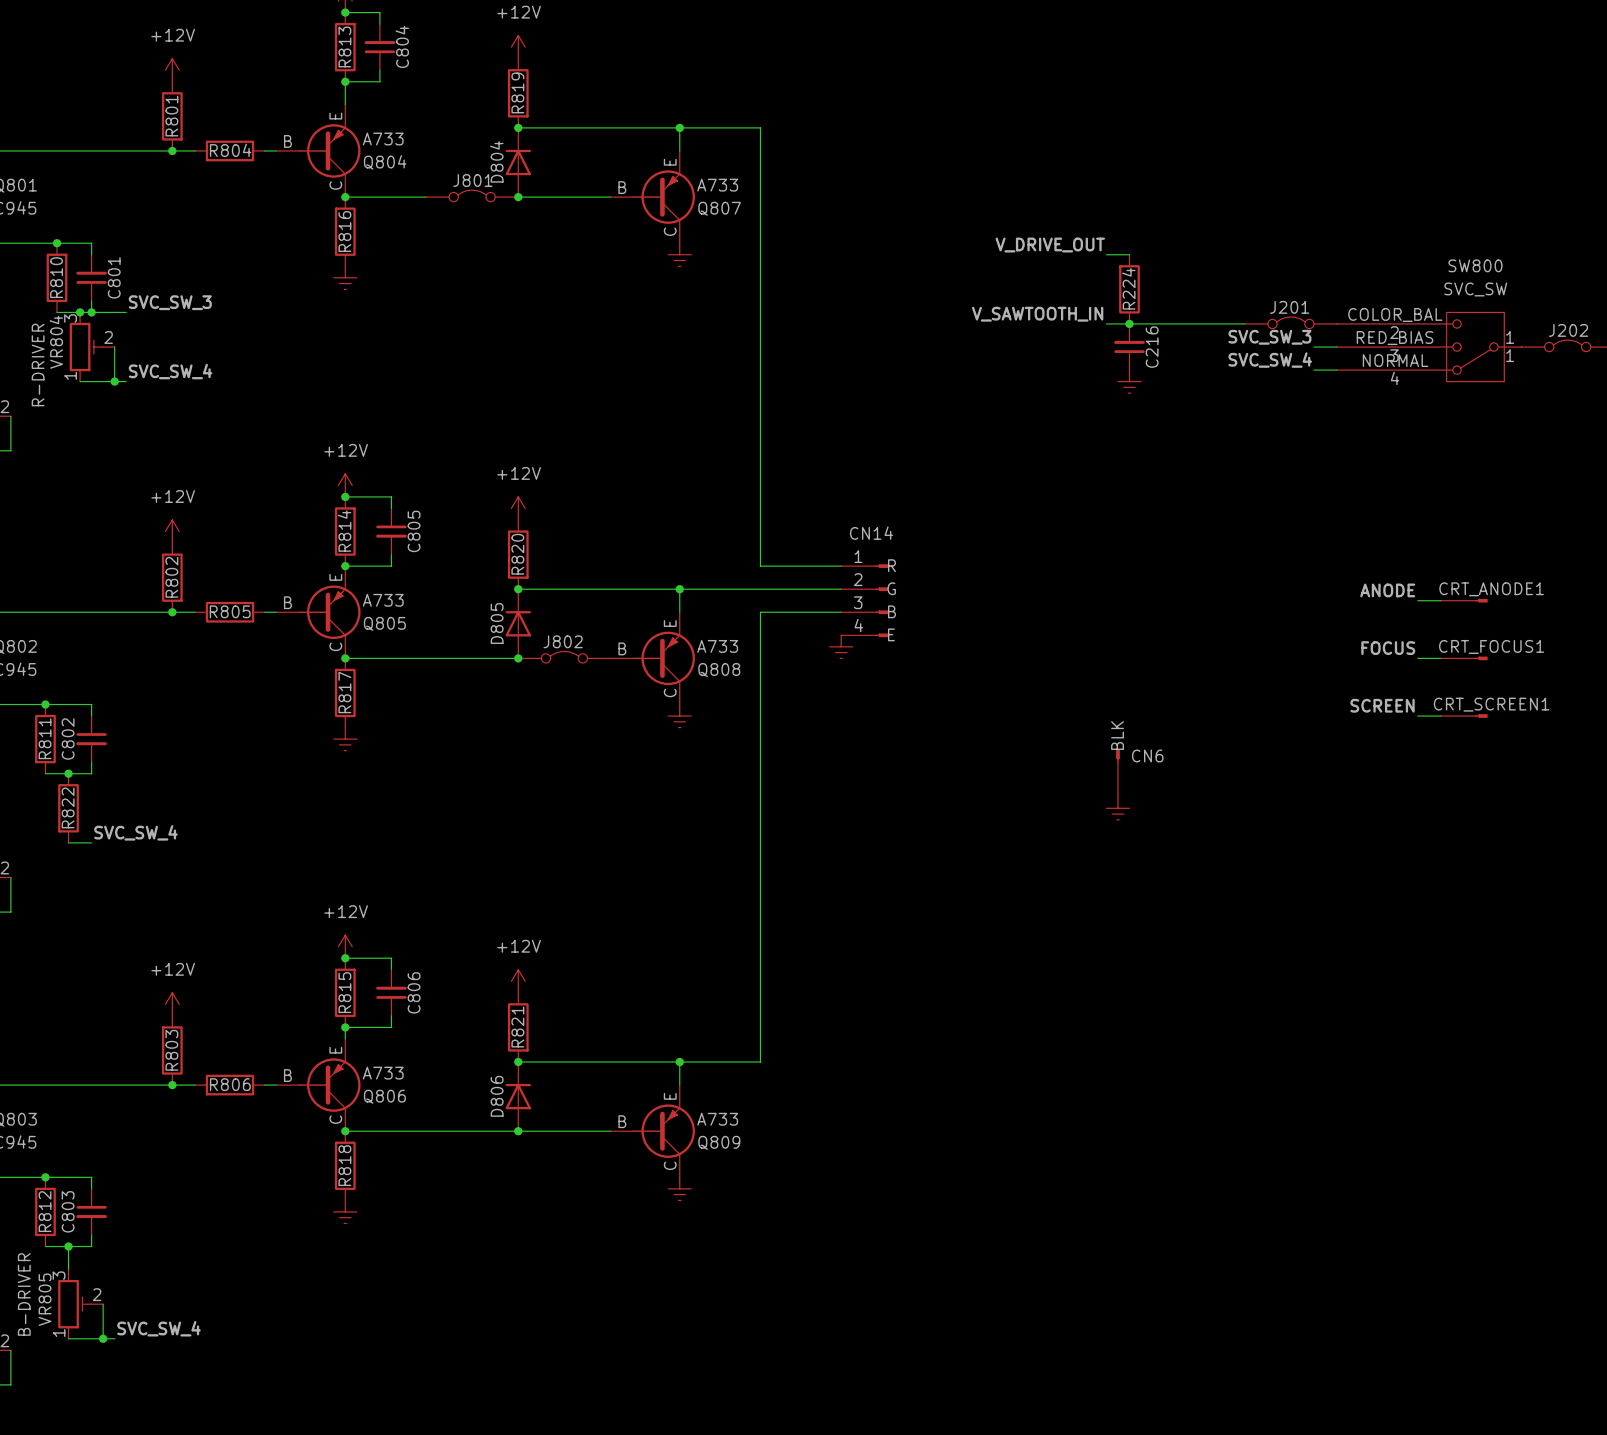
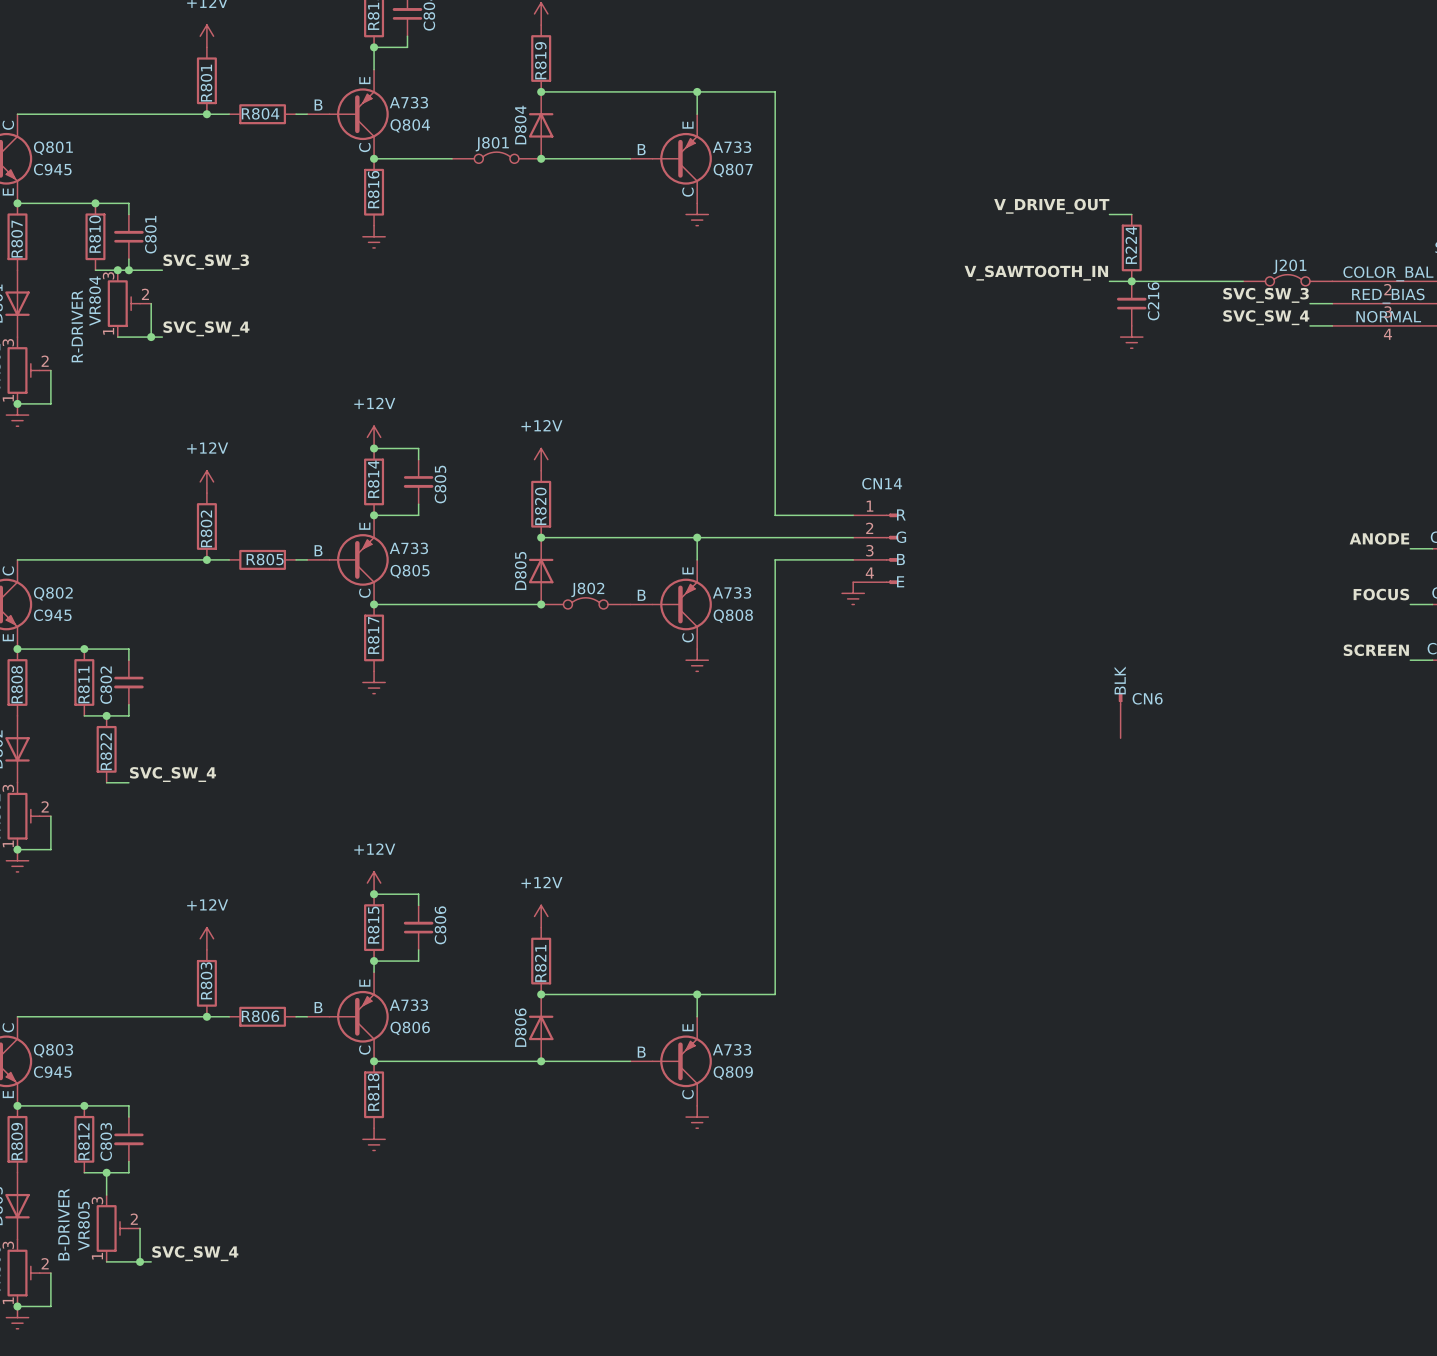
power symbol: (1117, 808) -> none

